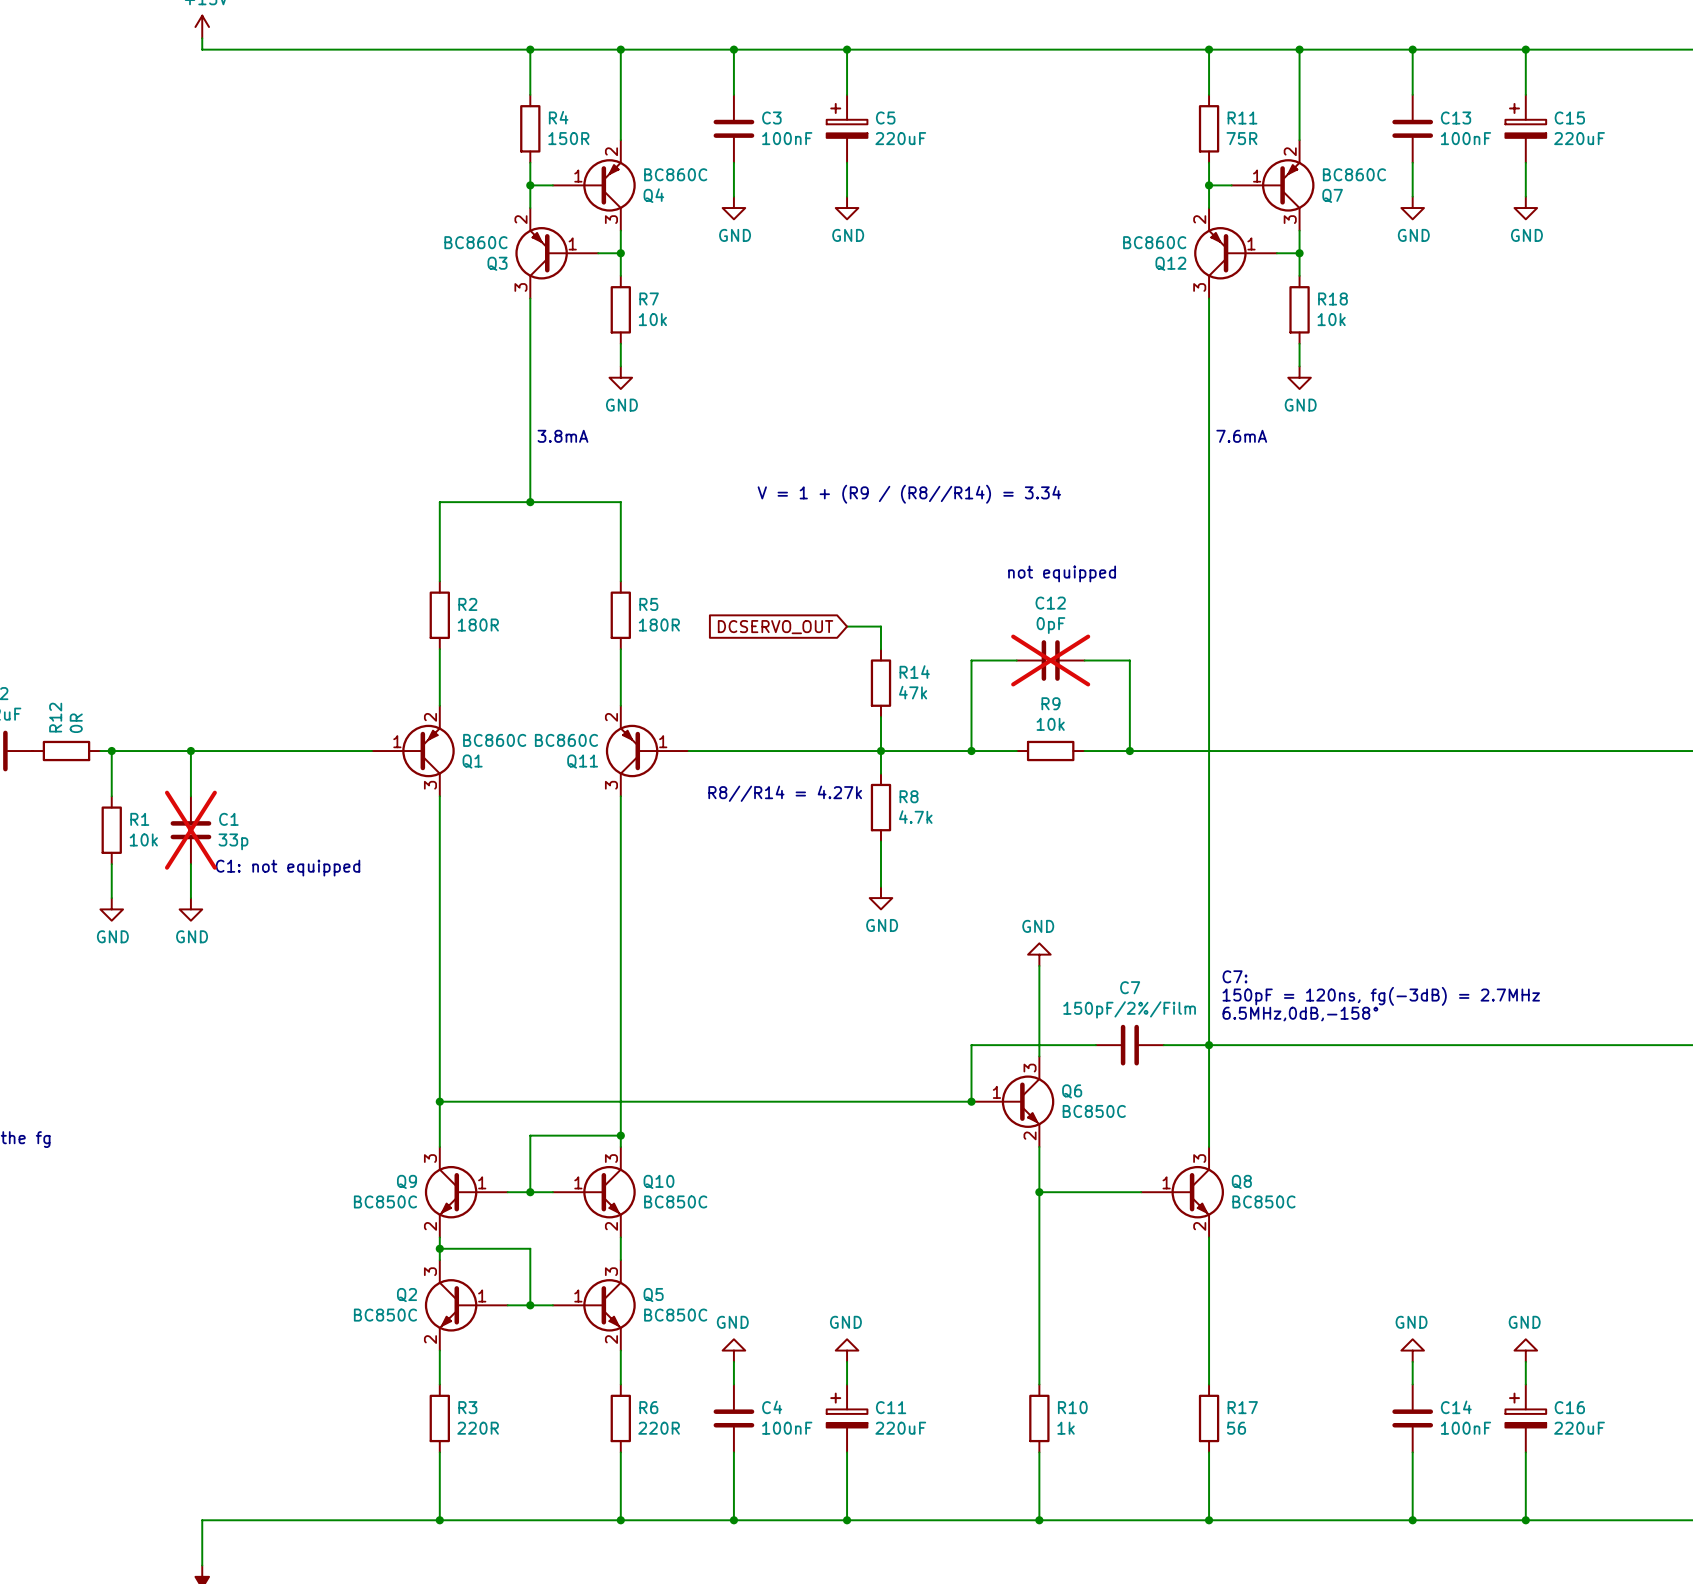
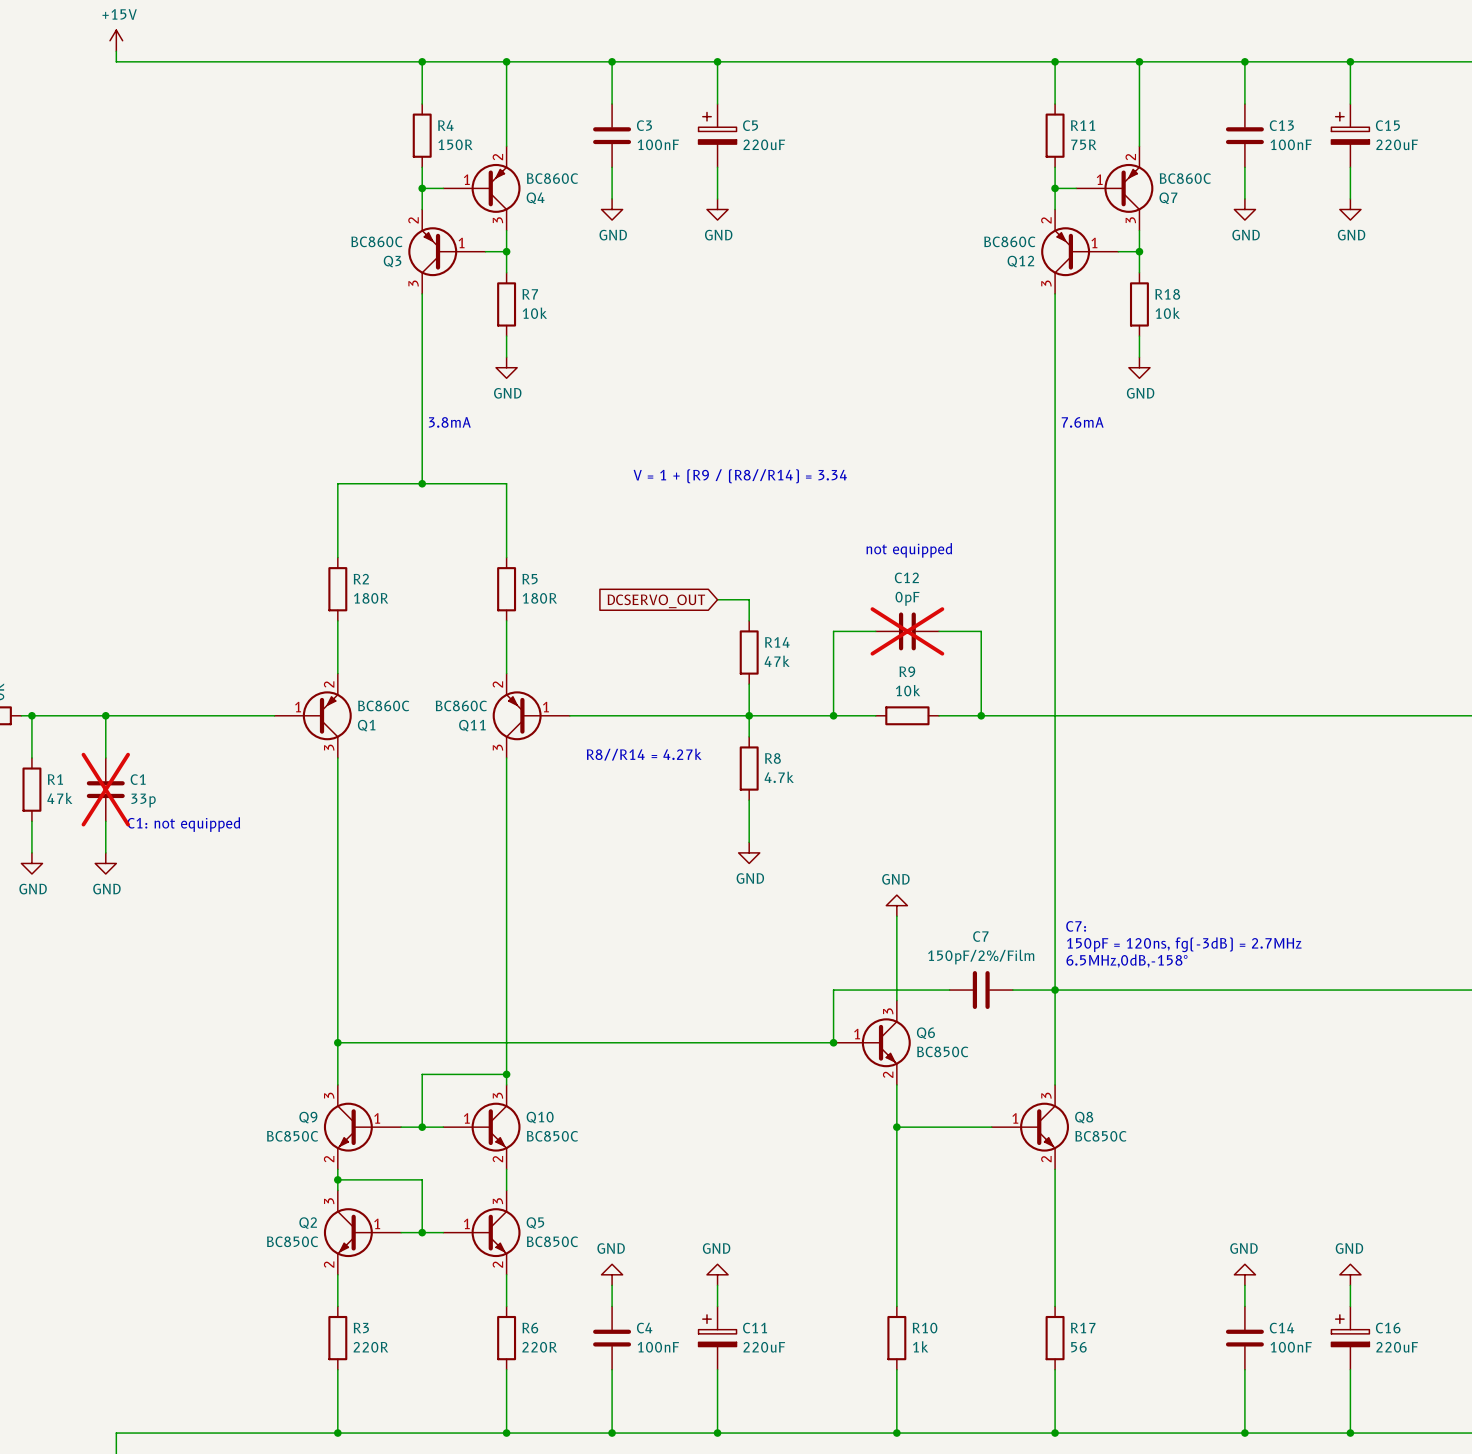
R1 value: 10k (143, 839) -> 47k (59, 798)

